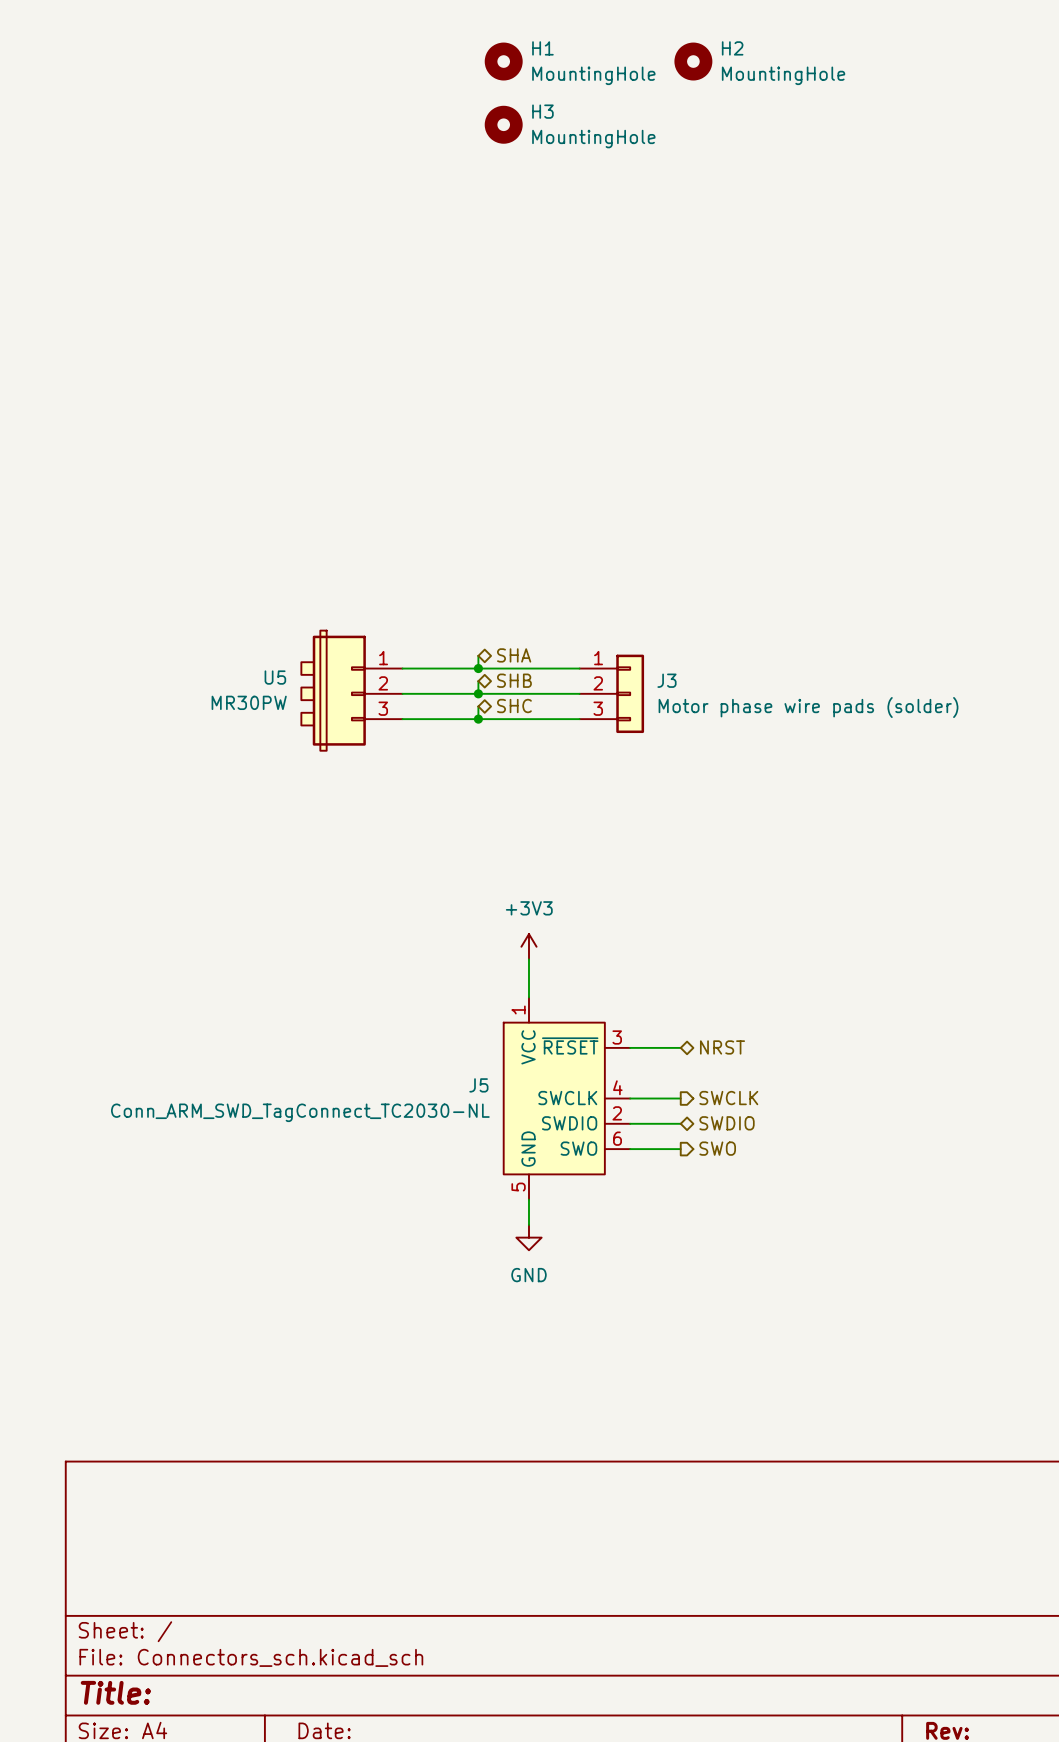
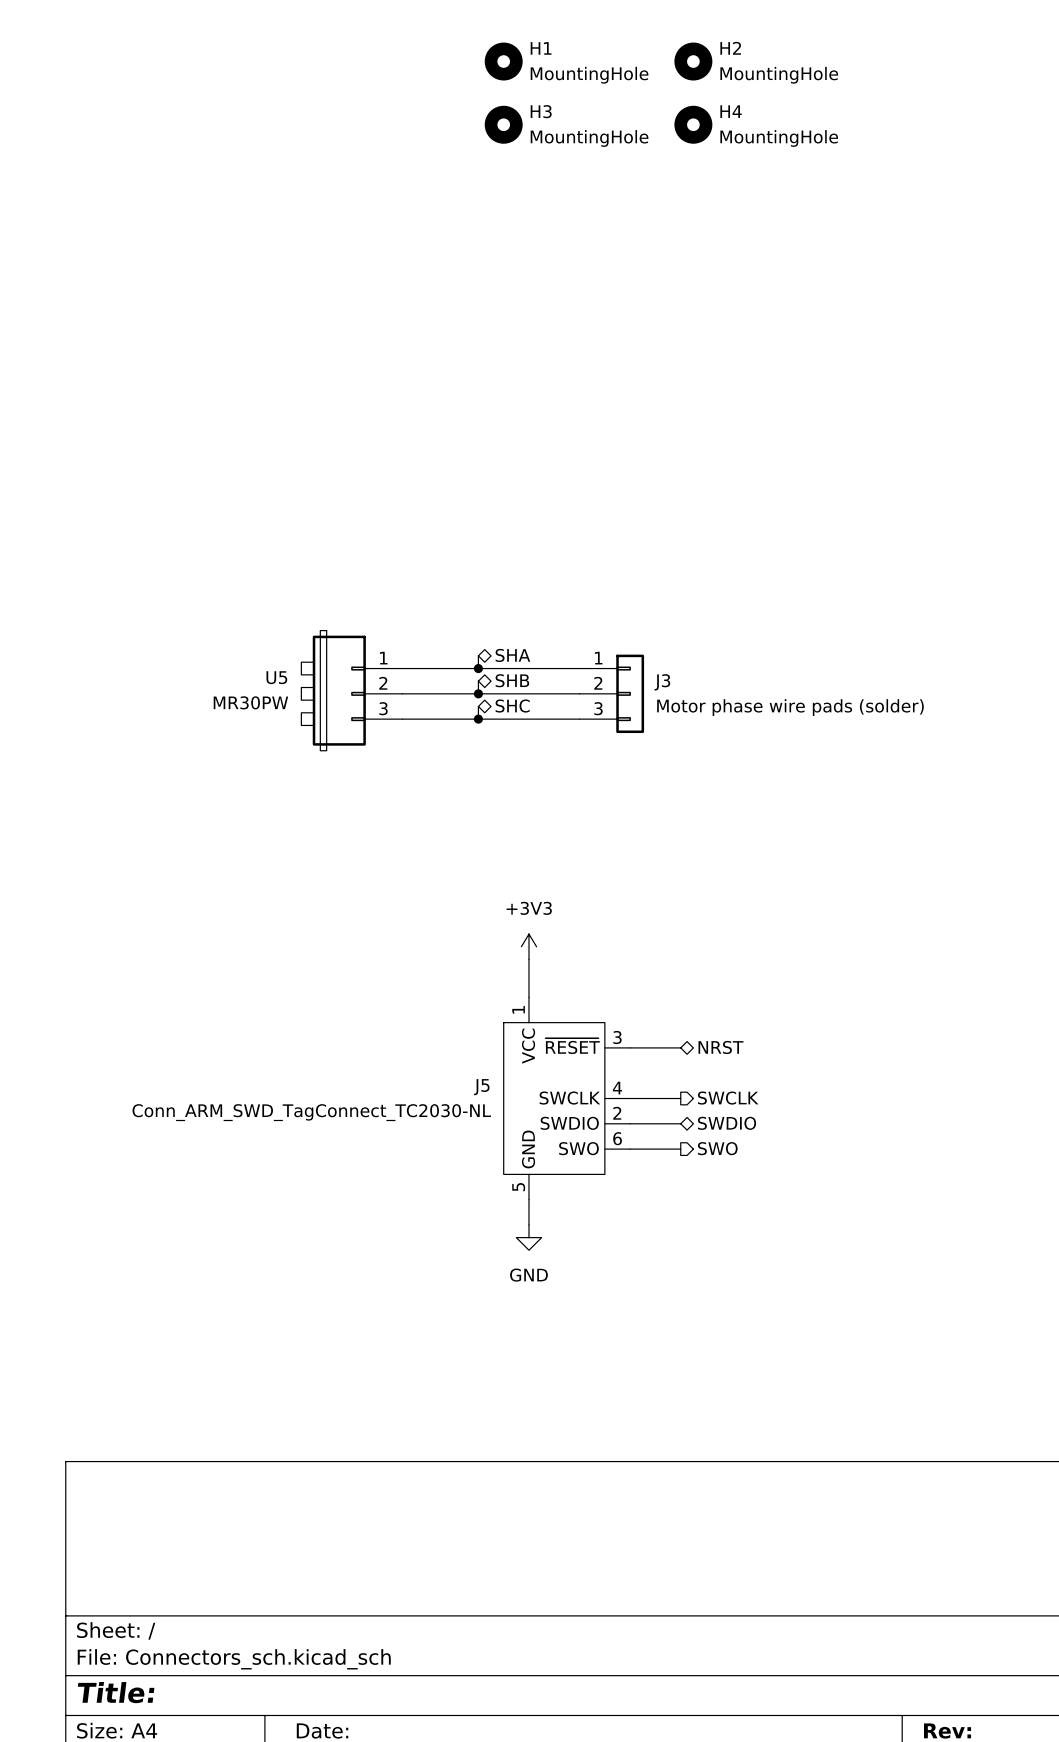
H4: none -> MountingHole (693, 124)

